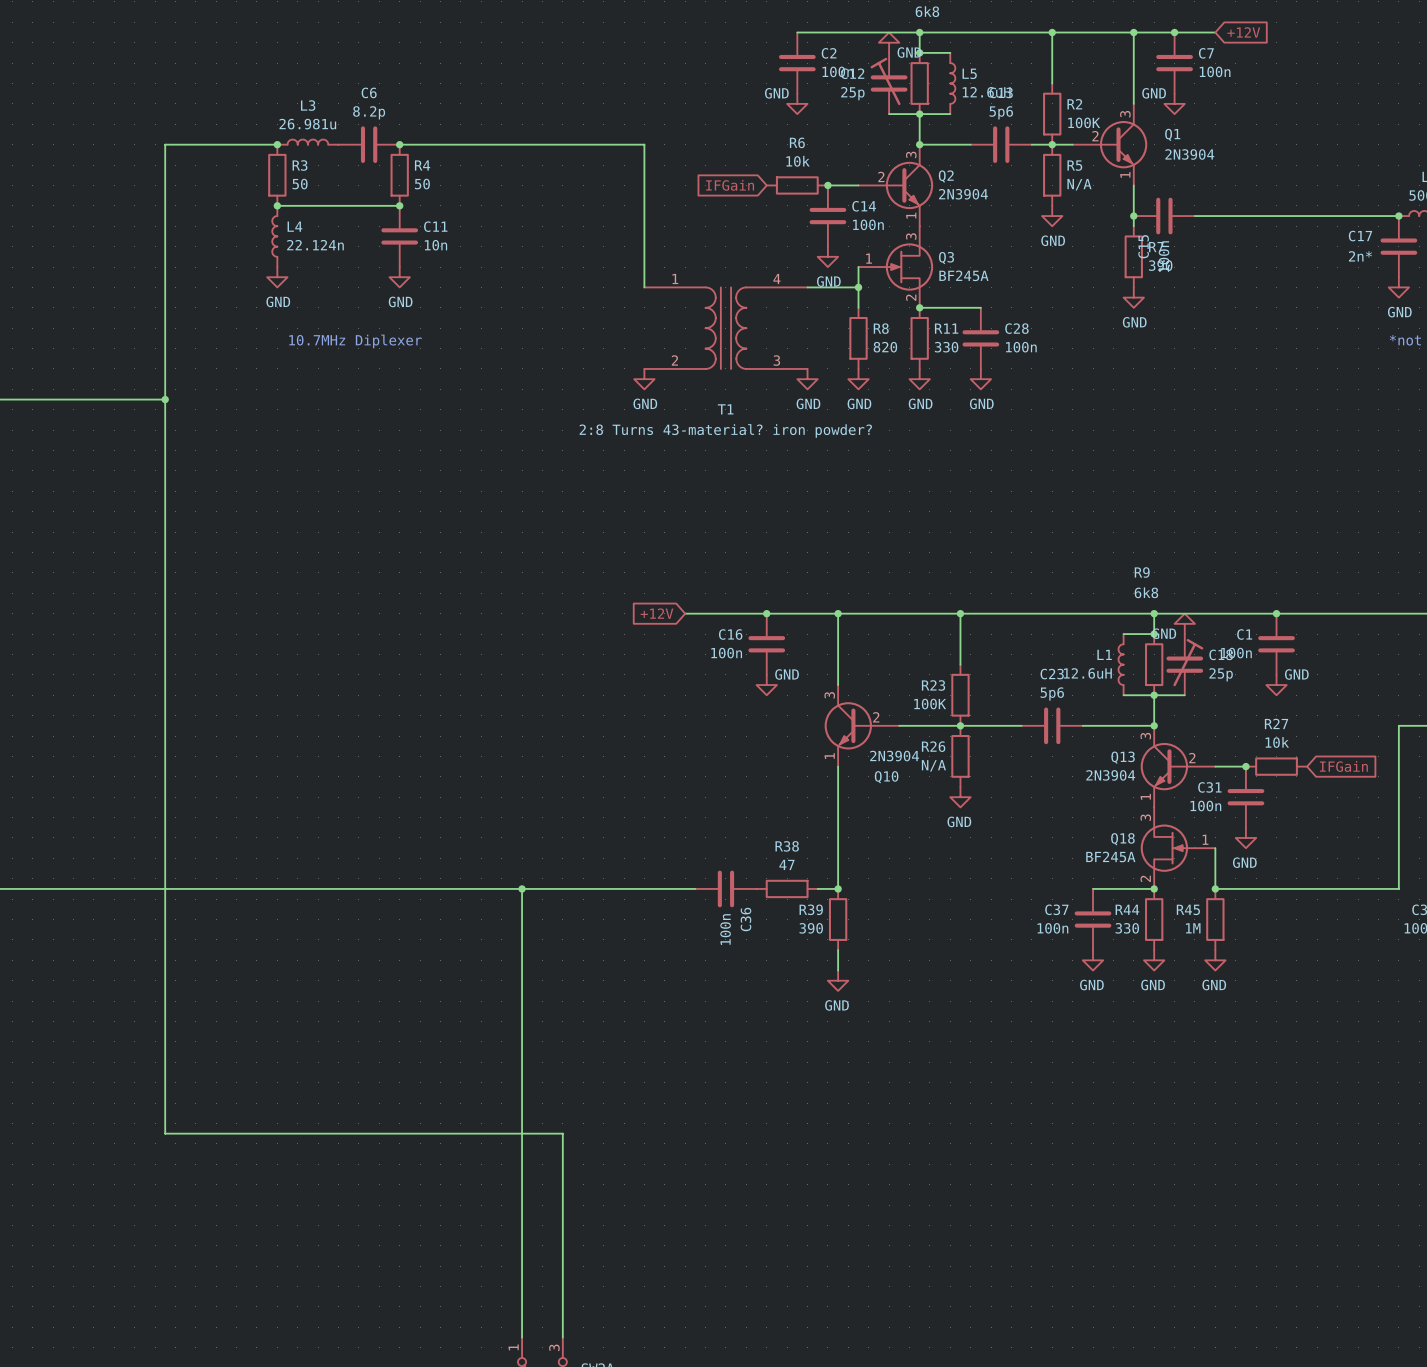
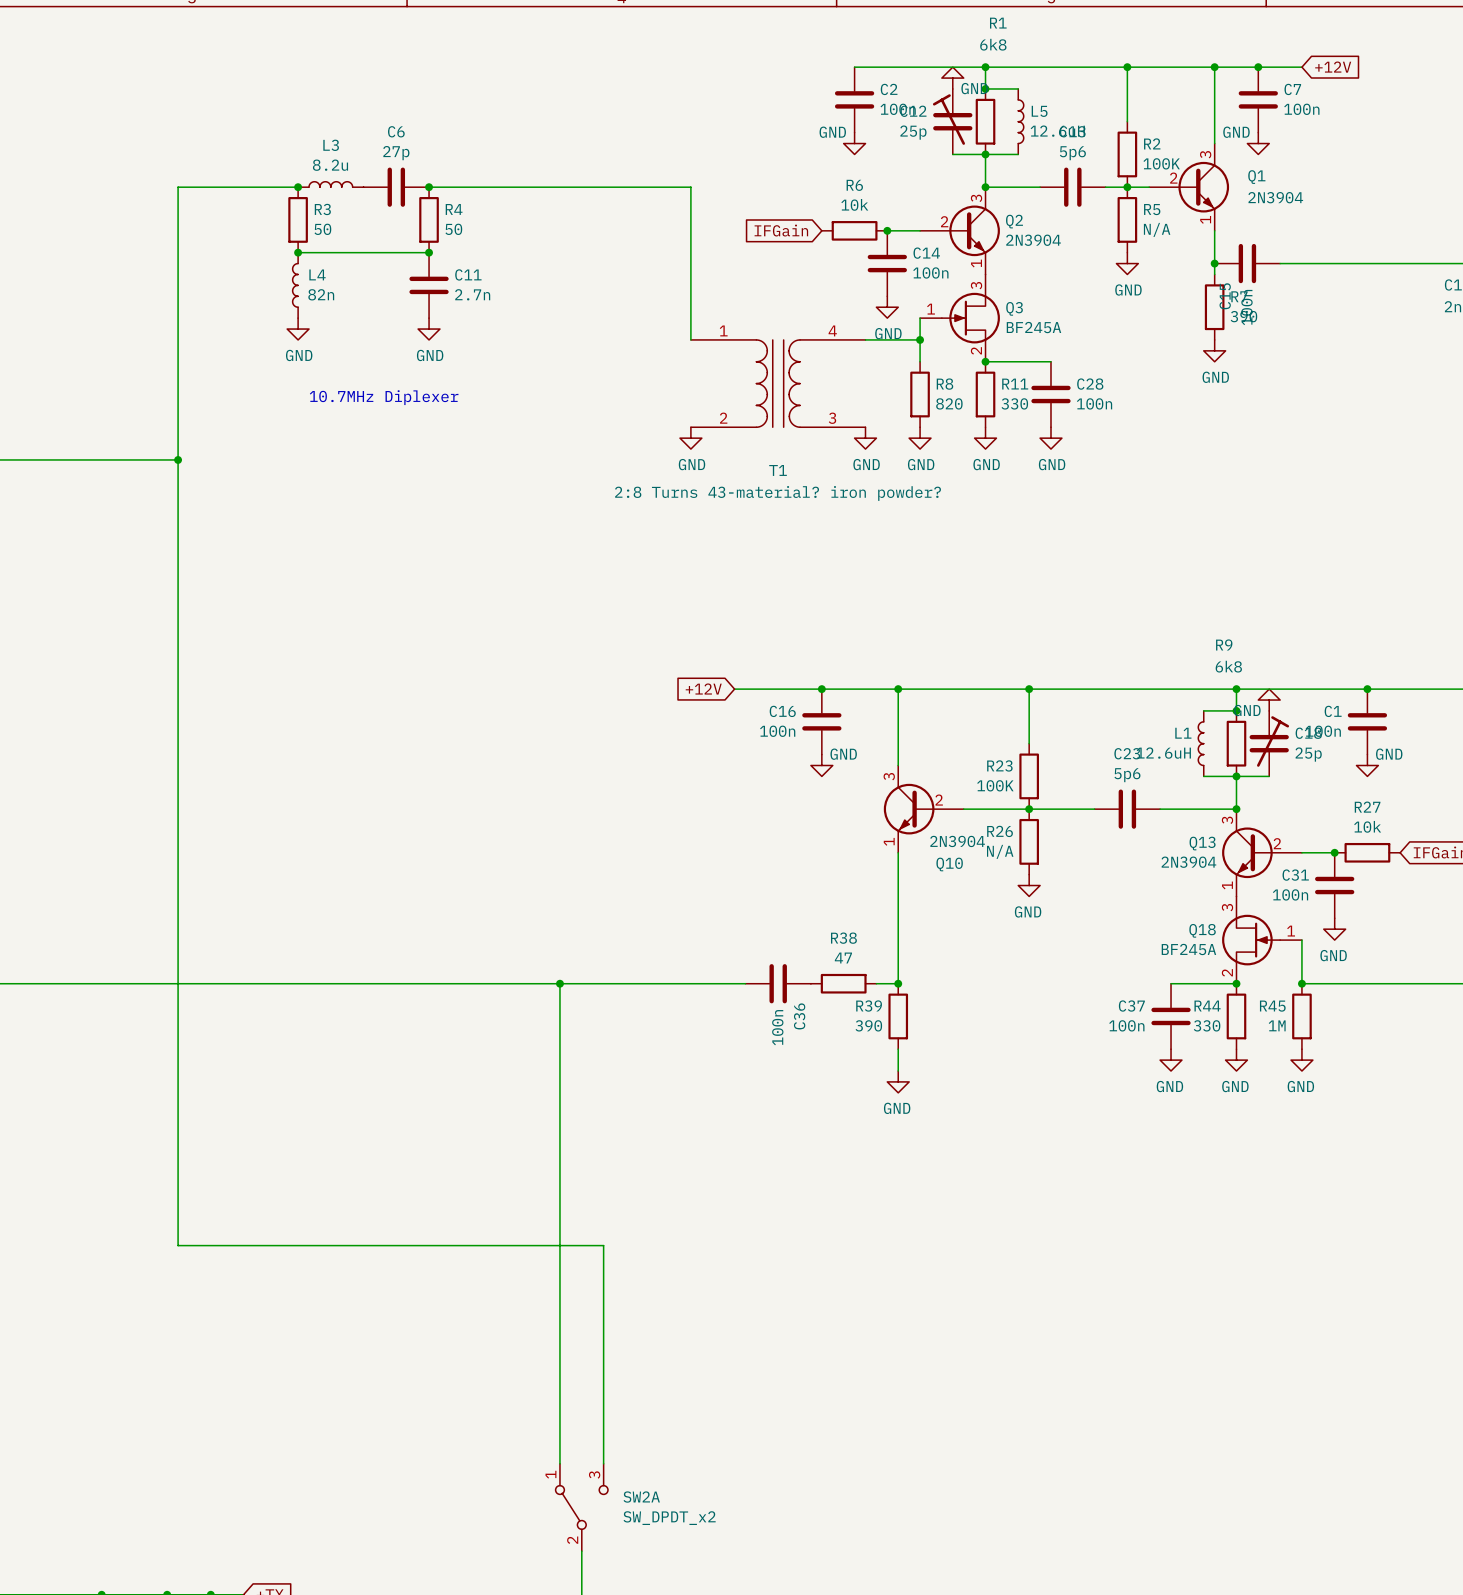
C6 value: 8.2p (369, 112) -> 27p (396, 153)
L3 value: 26.981u (307, 124) -> 8.2u (330, 165)
L4 value: 22.124n (315, 245) -> 82n (321, 294)
C11 value: 10n (435, 245) -> 2.7n (472, 294)

